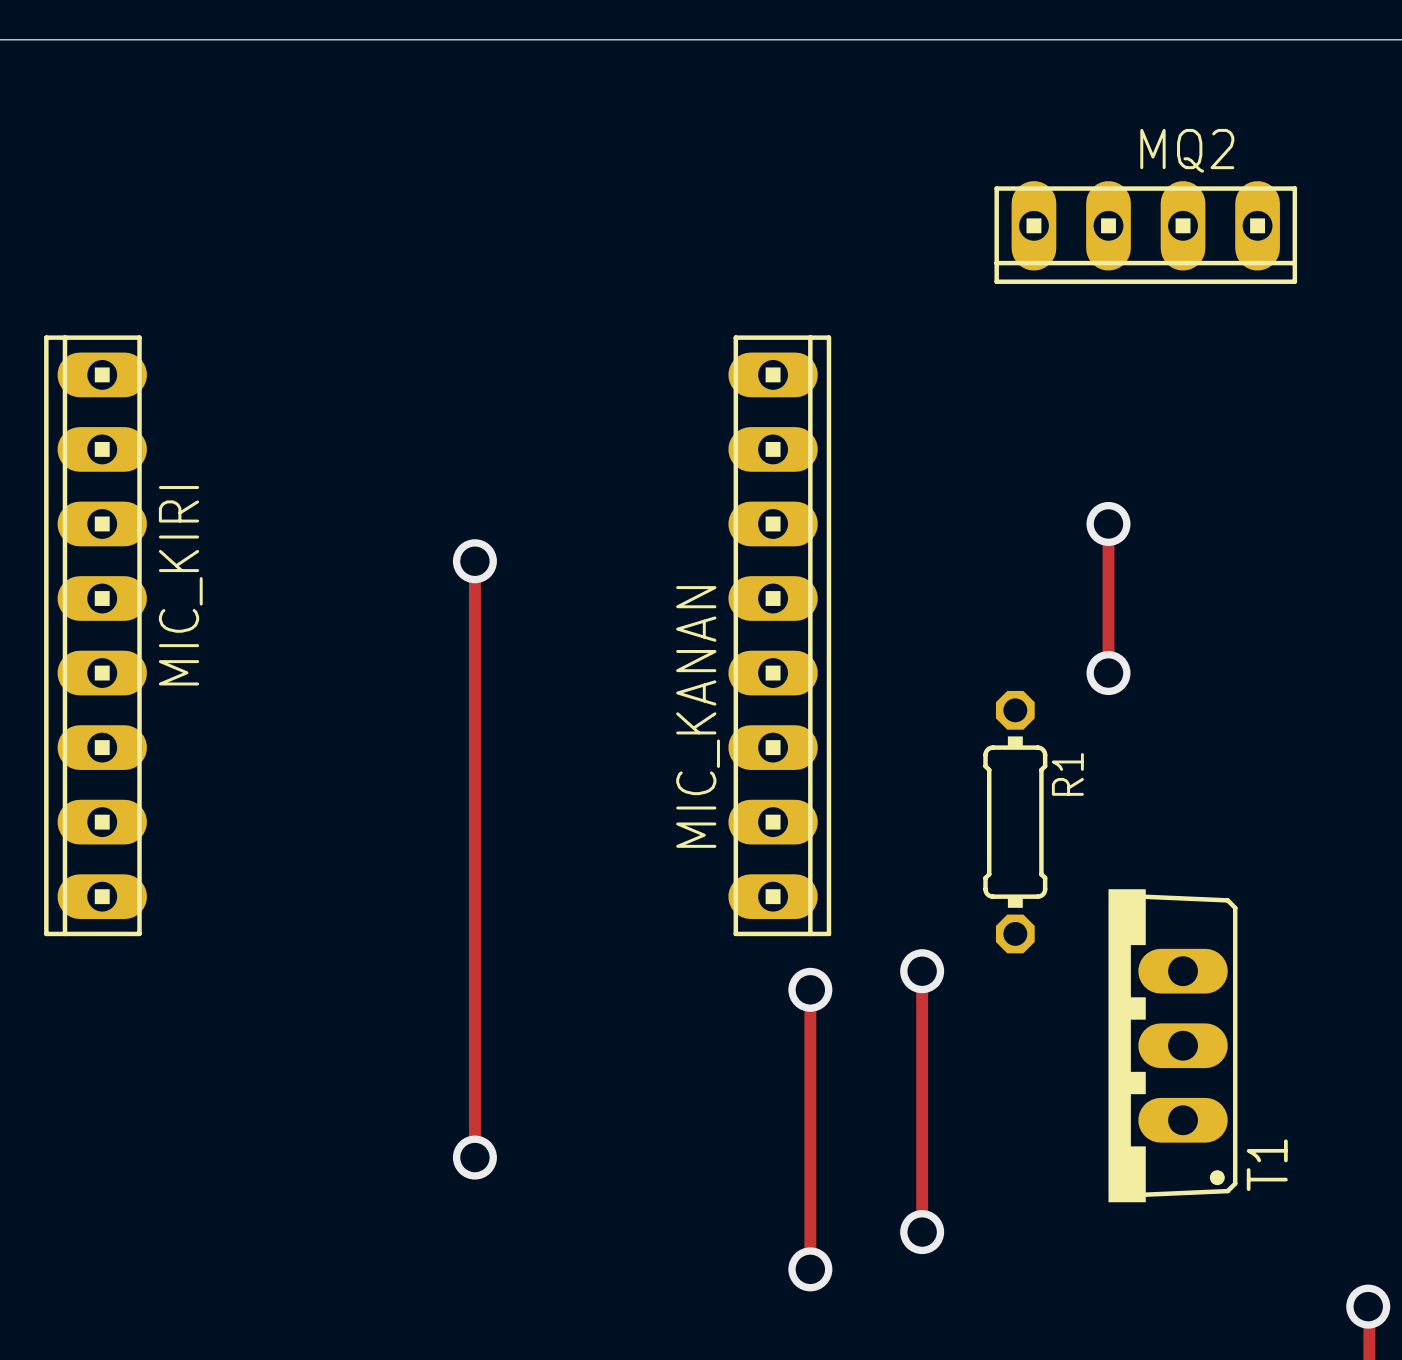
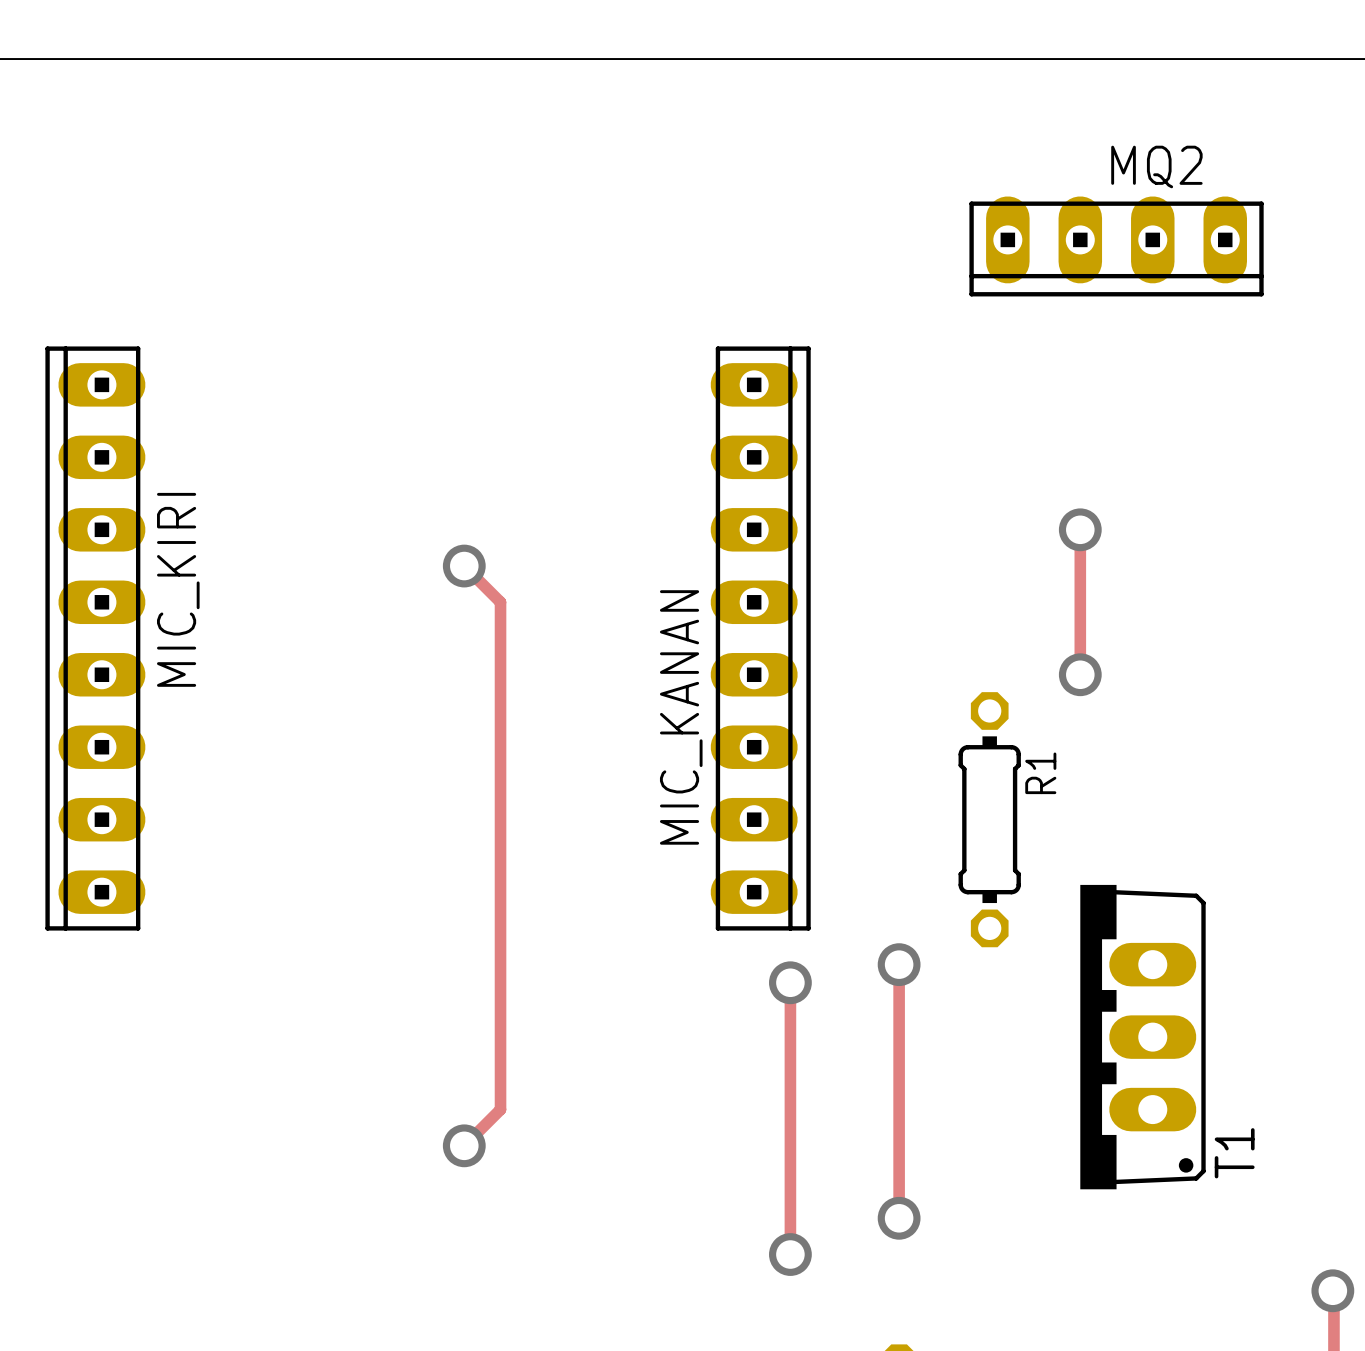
track: (474, 561) (474, 1157) -> (464, 566) (500, 602) (500, 1109) (464, 1145)

